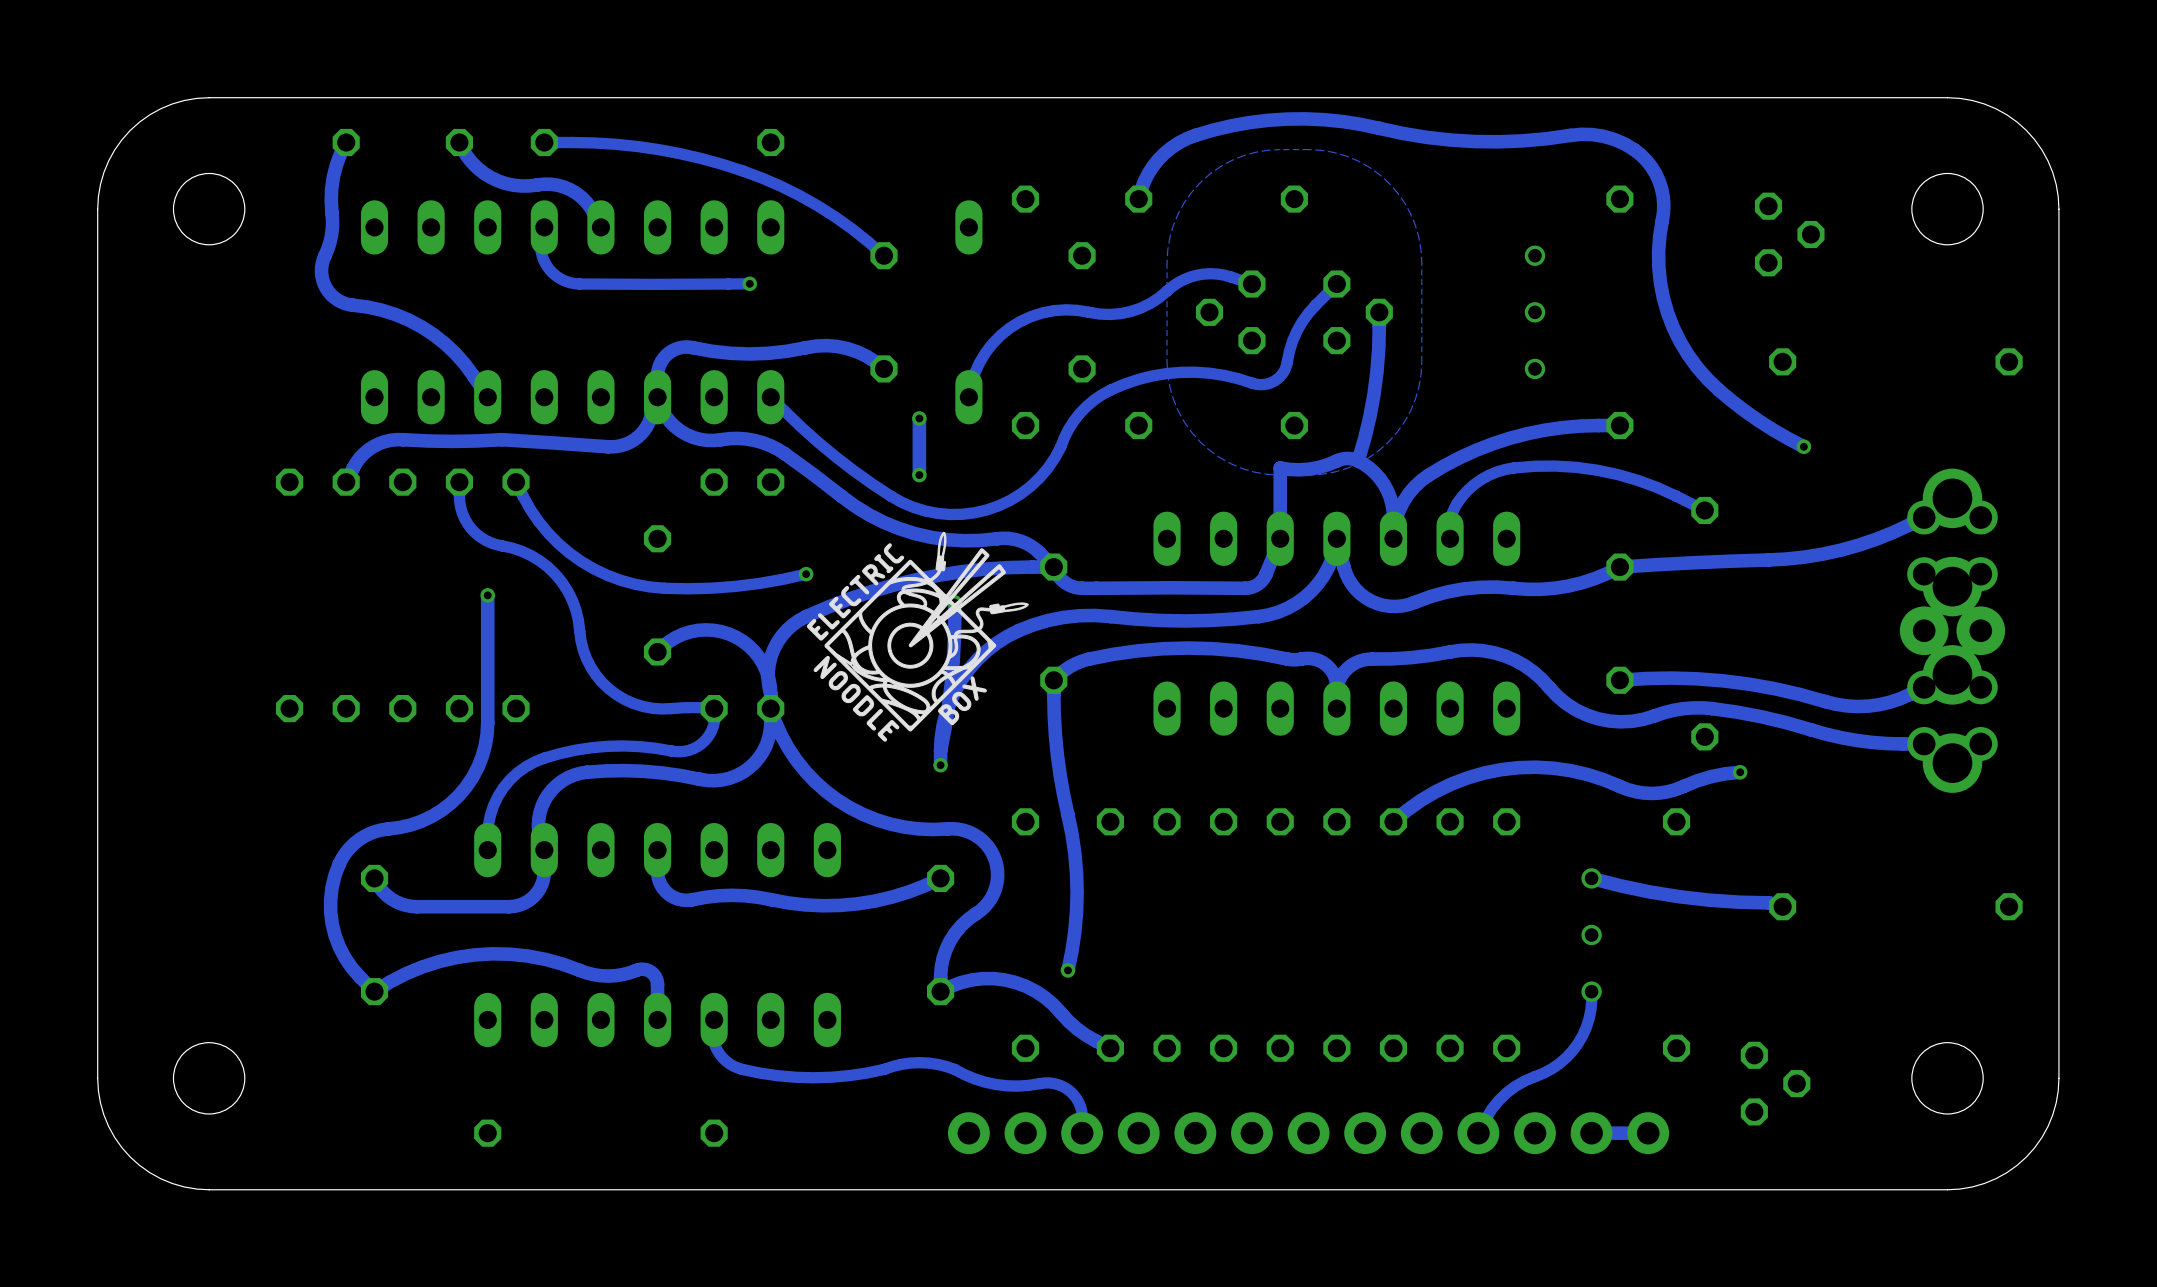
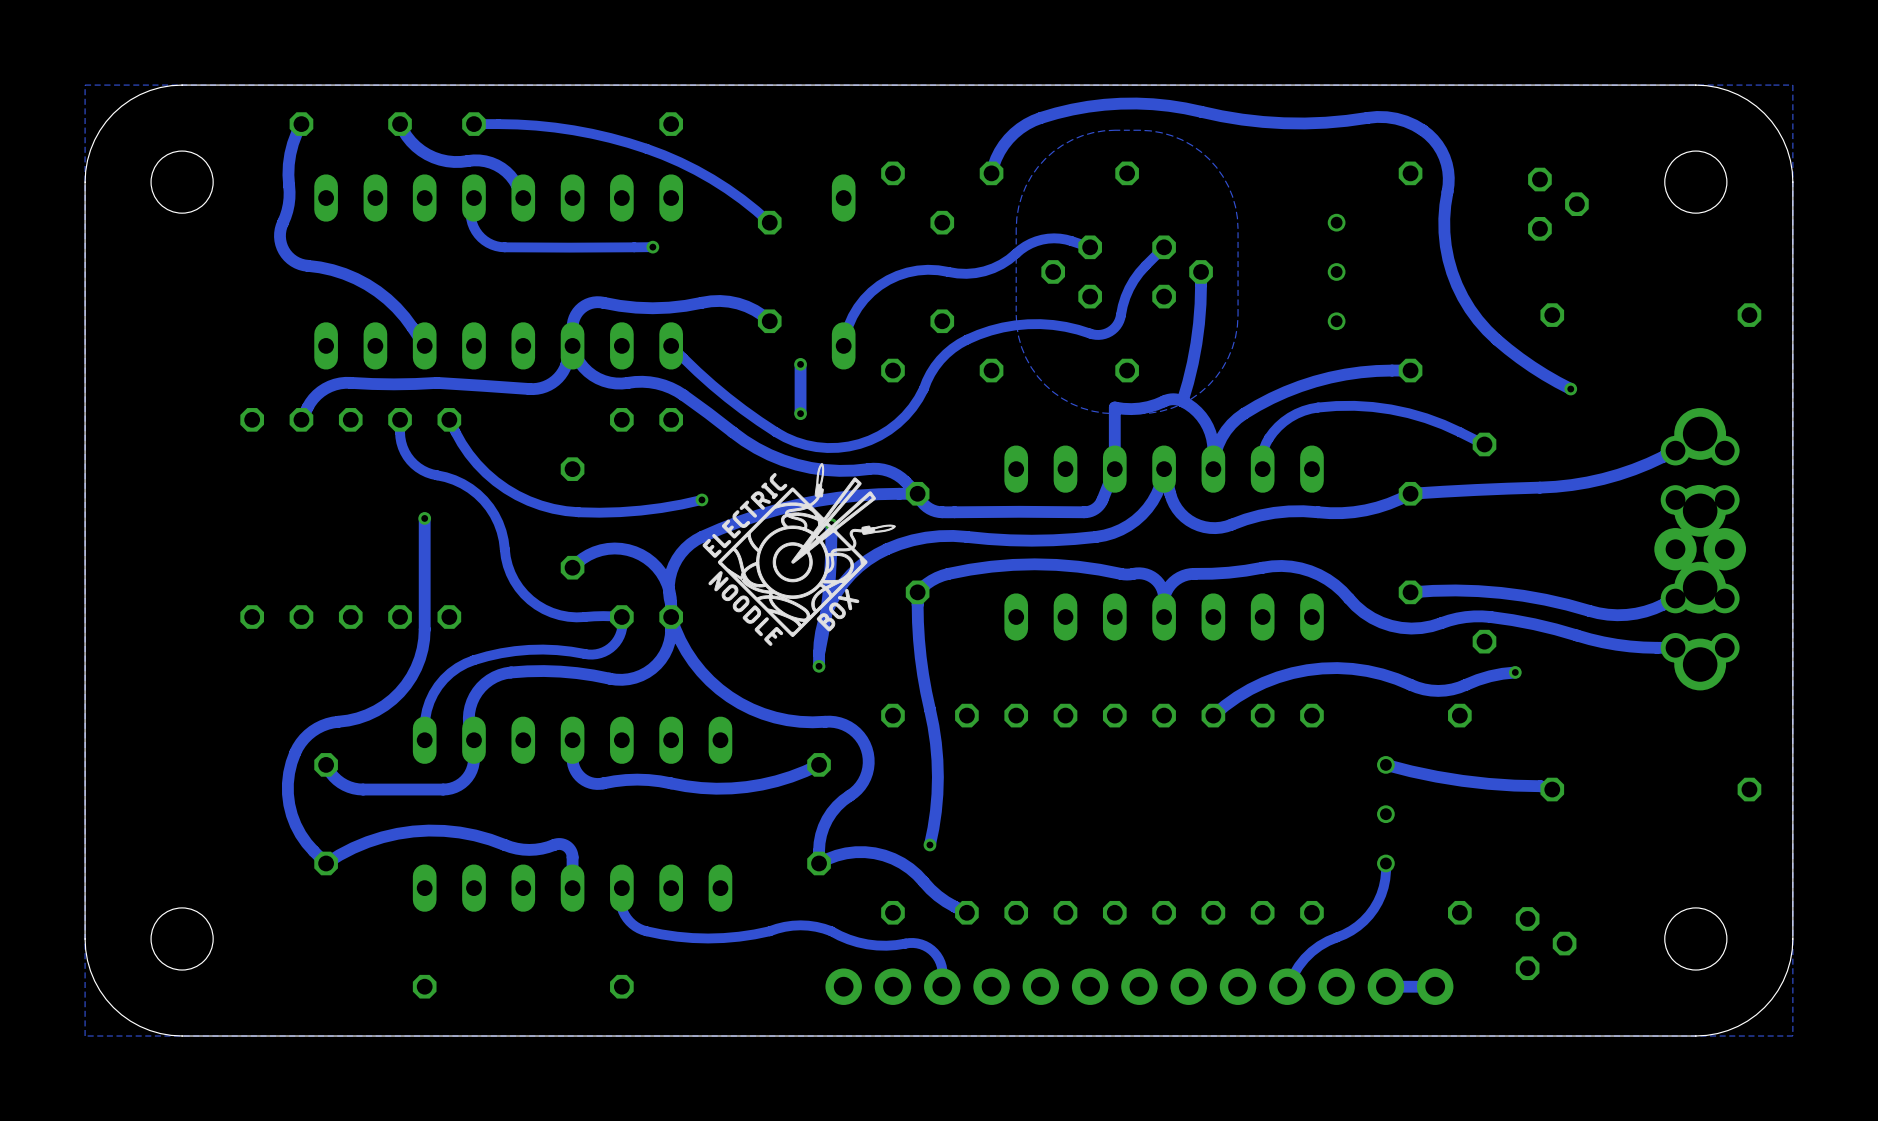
zone outline: none -> (1792, 85) (85, 85) (85, 1036) (1792, 1036) (1792, 85)

